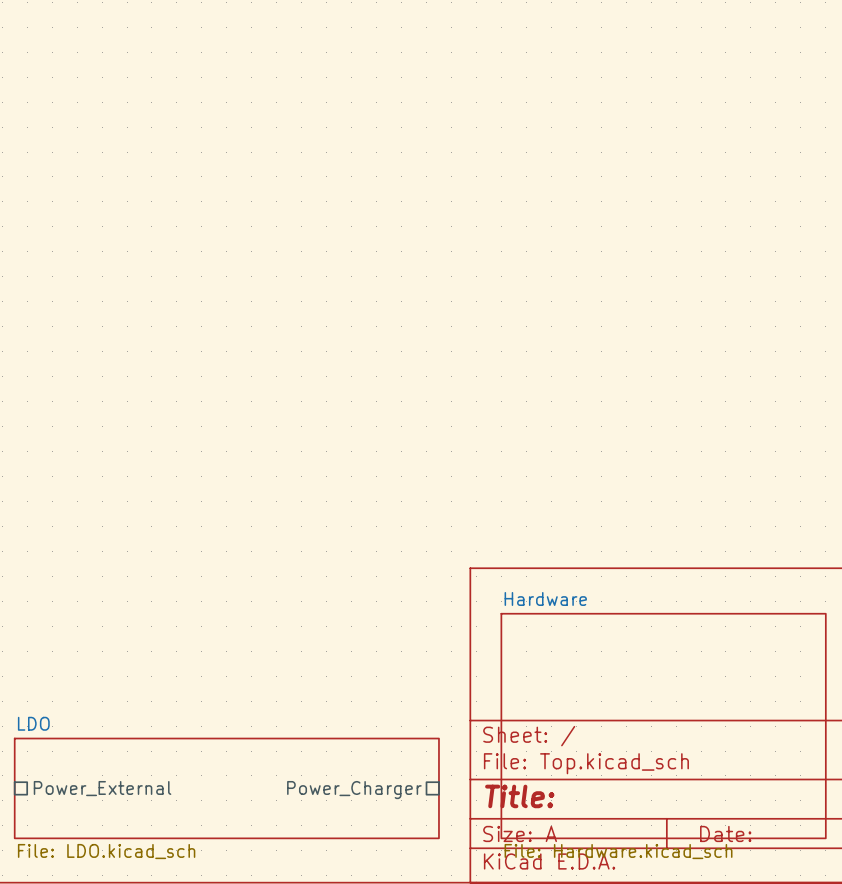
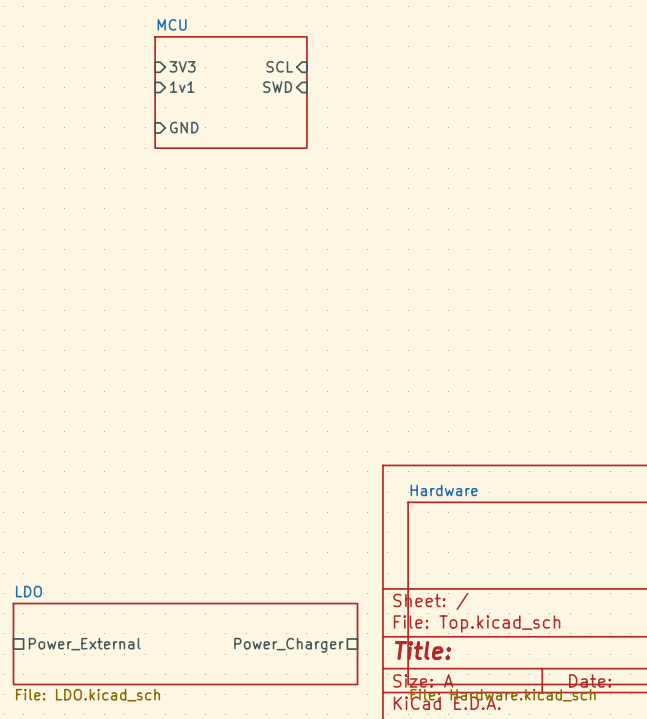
sheet pin: none -> 3V3 (182, 66)
sheet pin: none -> SCL (279, 66)
sheet pin: none -> 1v1 (182, 87)
sheet pin: none -> SWD (277, 87)
sheet MCU: none -> (231, 92)
sheet pin: none -> GND (184, 127)

